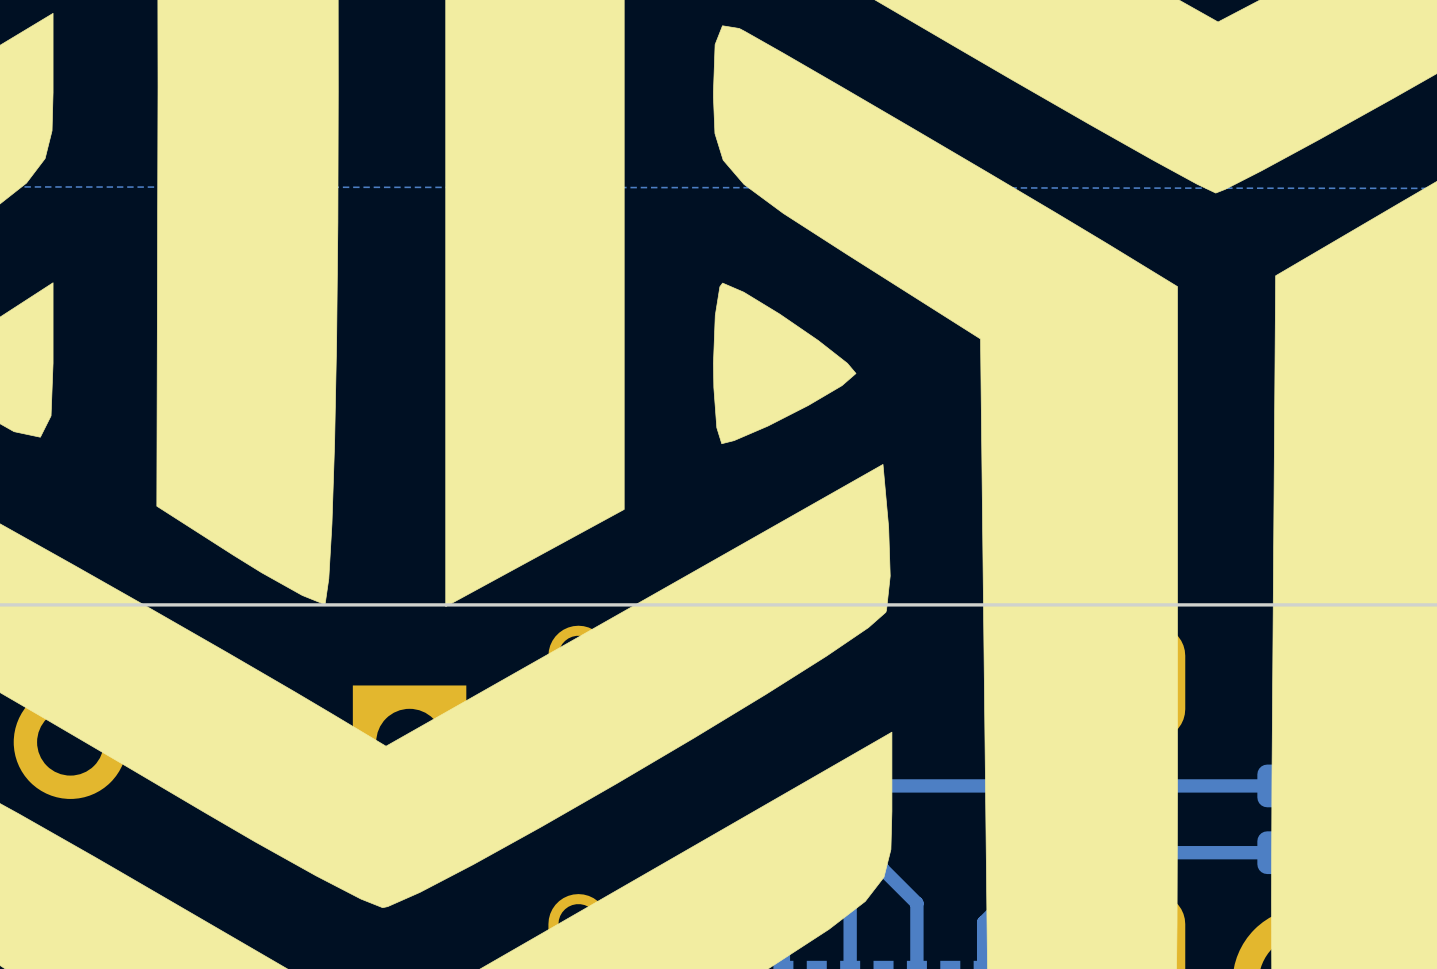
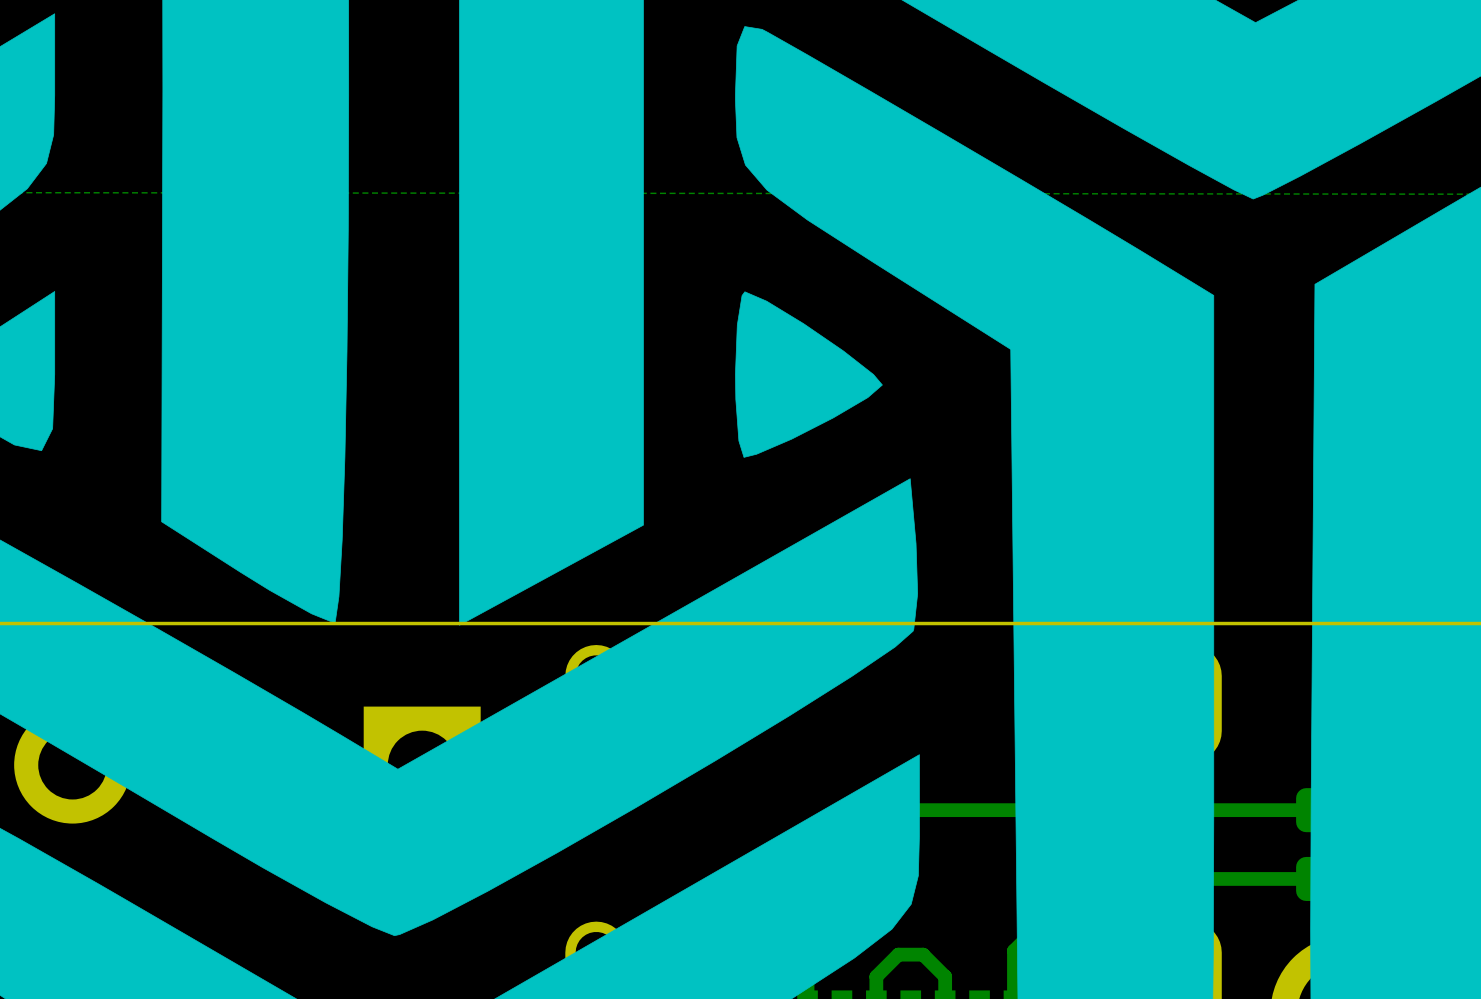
bottom track: (850, 947) (850, 901) (882, 869) (916, 903) (916, 947) -> (876, 976) (898, 954) (923, 954) (945, 976)

